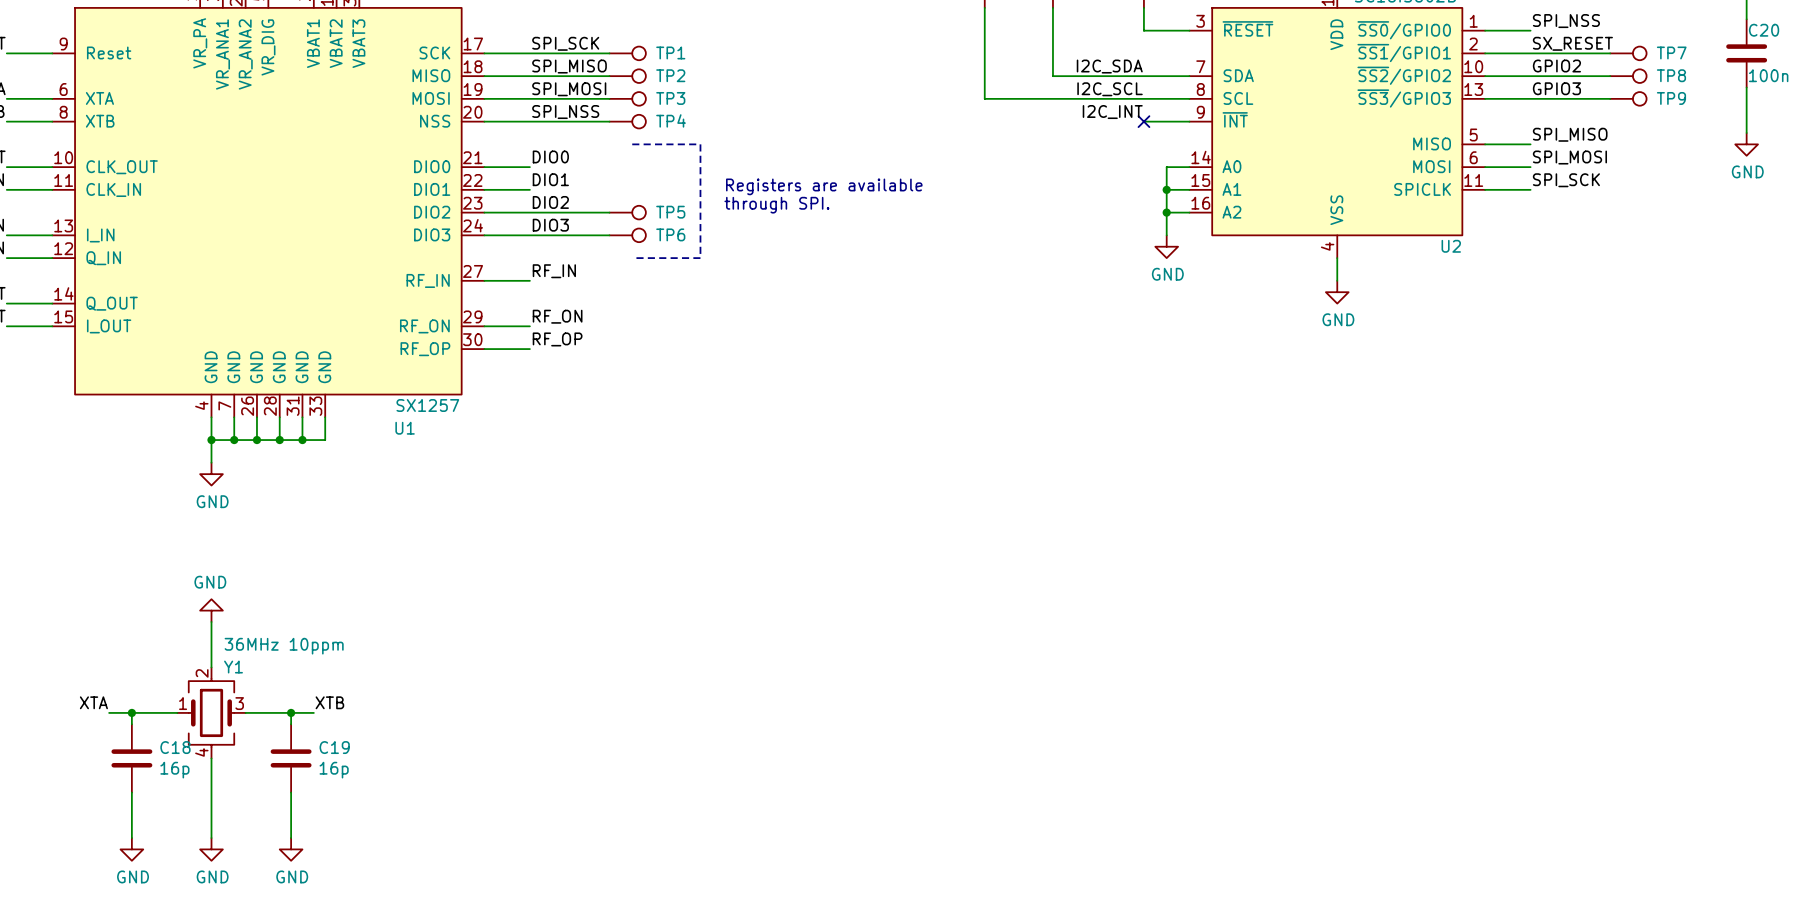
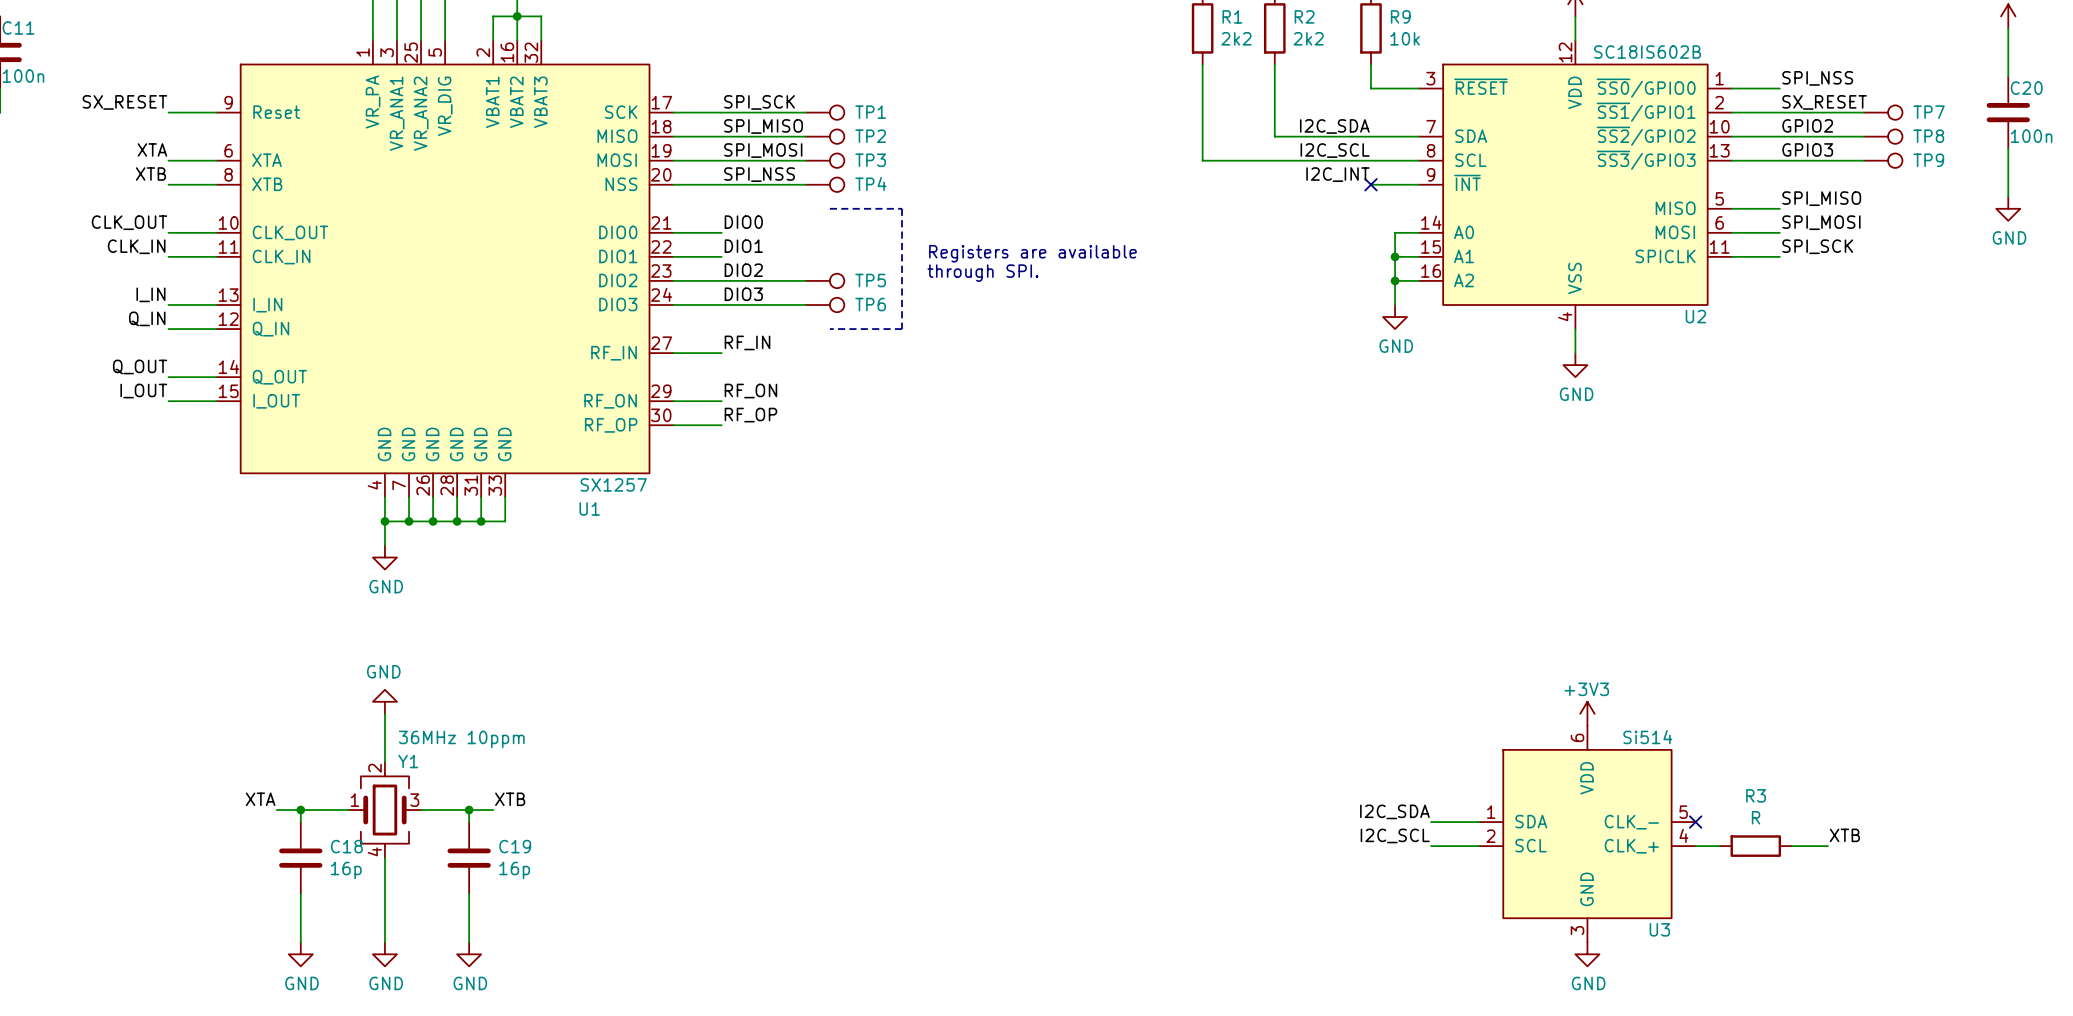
power symbol: none -> +3V3 (1587, 713)
label: none -> I2C_SDA (1394, 811)
wire: none -> (1431, 822) (1479, 822)
no-connect mark: none -> (1695, 822)
U3: none -> Si514 (1587, 834)
label: none -> XTB (1844, 835)
label: none -> I2C_SCL (1395, 835)
wire: none -> (1431, 846) (1479, 846)
wire: none -> (1695, 846) (1719, 846)
R3: none -> R (1755, 846)
wire: none -> (1791, 846) (1827, 846)
power symbol: none -> GND (1587, 954)

